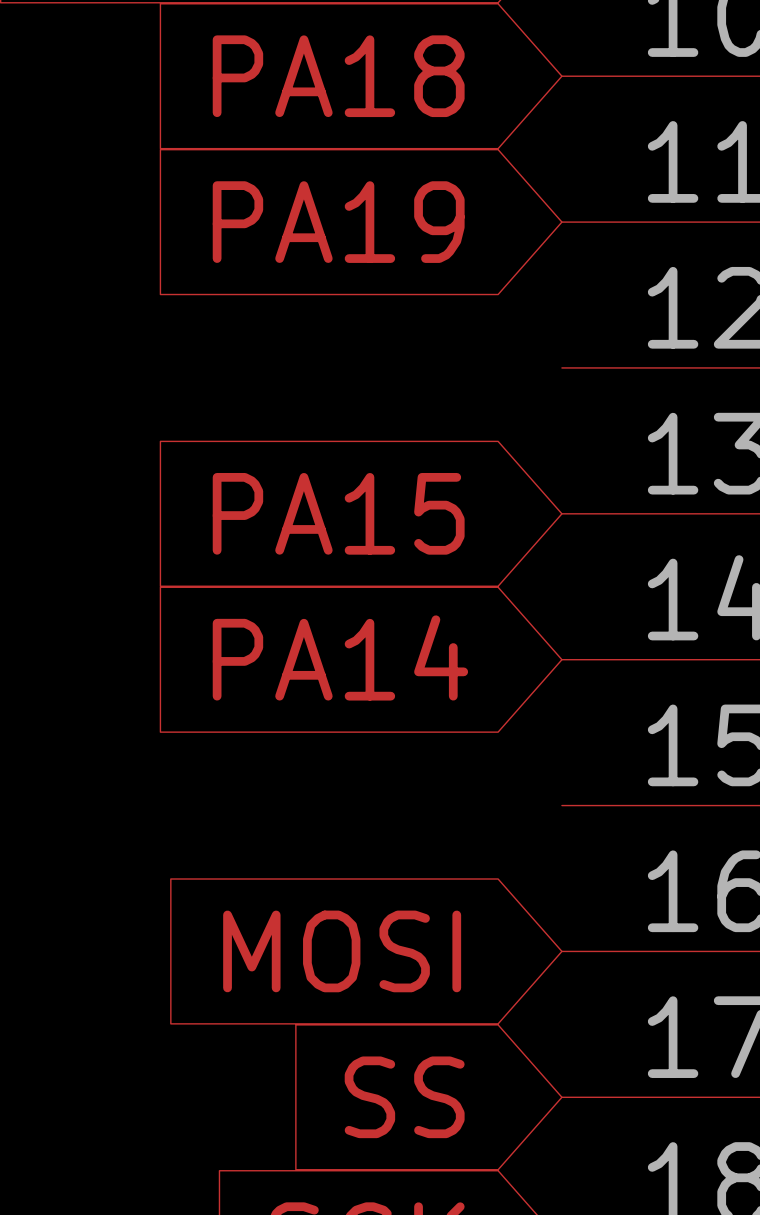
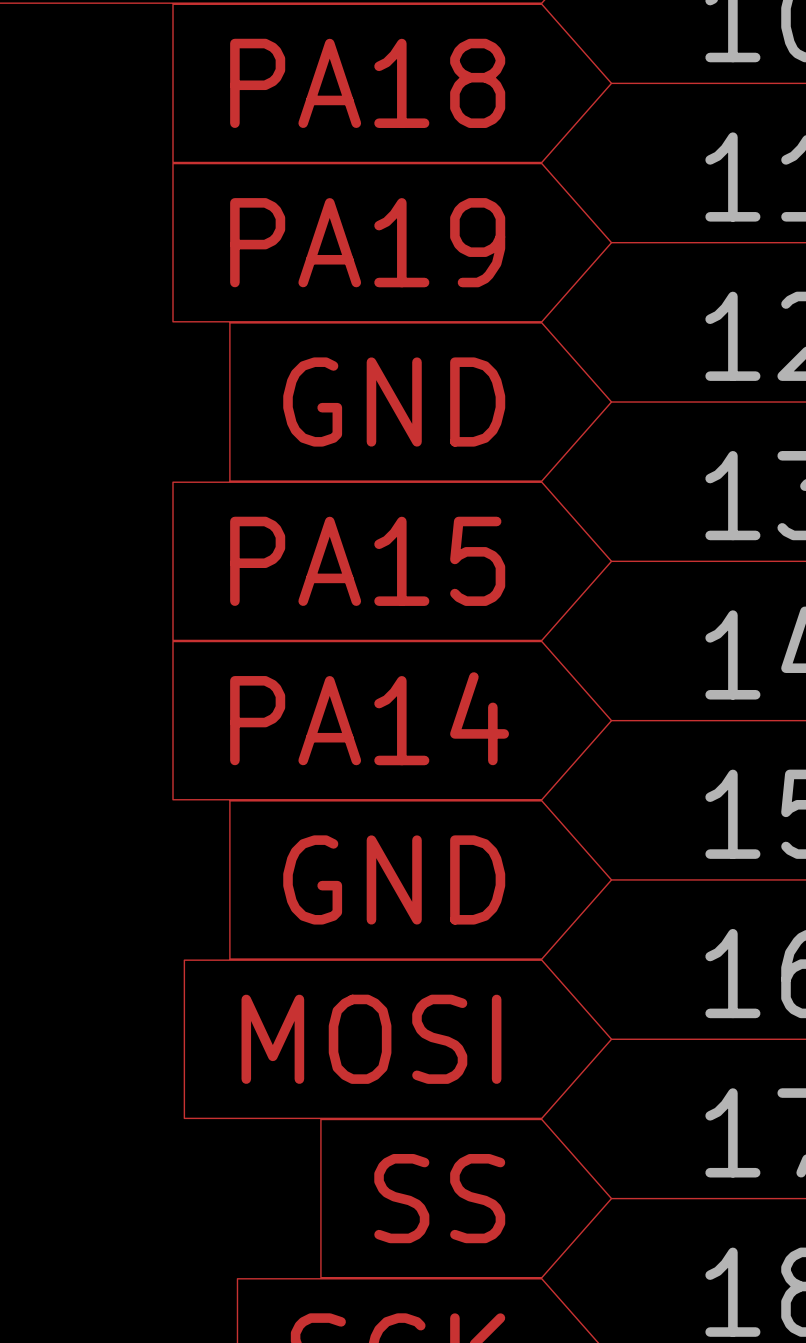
global label: none -> GND (394, 402)
global label: none -> GND (394, 879)

